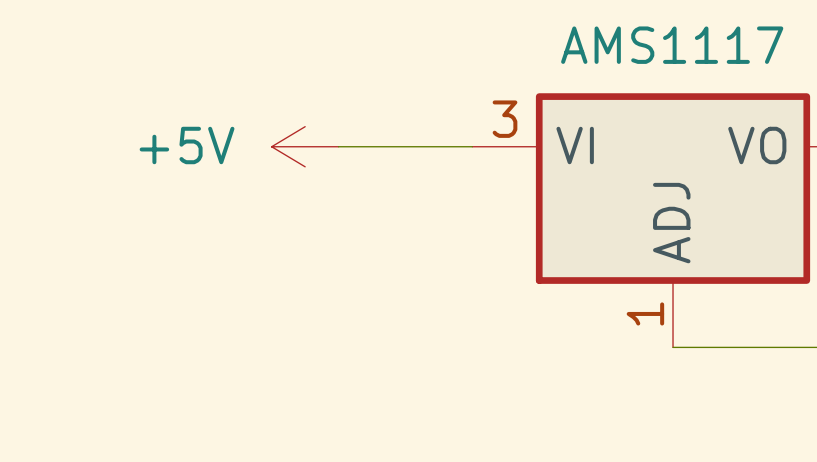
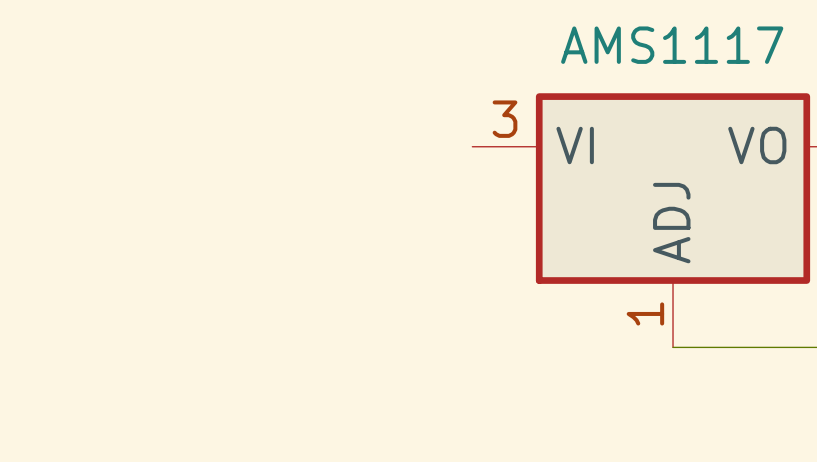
power symbol: +5V (305, 146) -> none
wire: (338, 146) (472, 146) -> none

